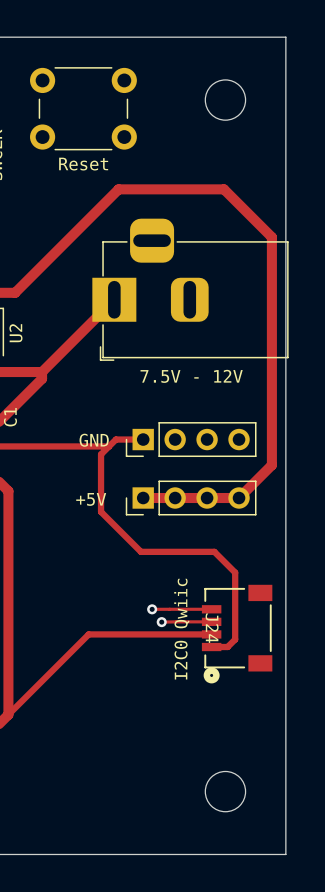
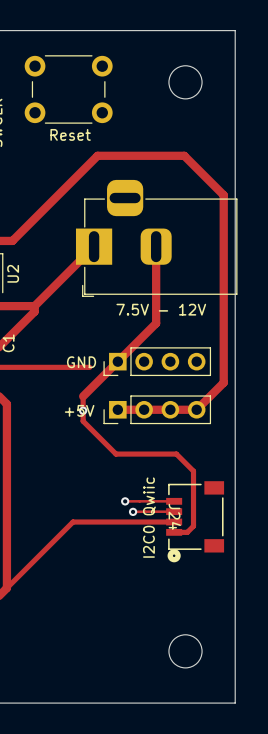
track: (143, 439) (115, 439) (101, 454) (101, 481) -> (156, 246) (156, 323) (83, 396)
via: none -> (83, 410)

